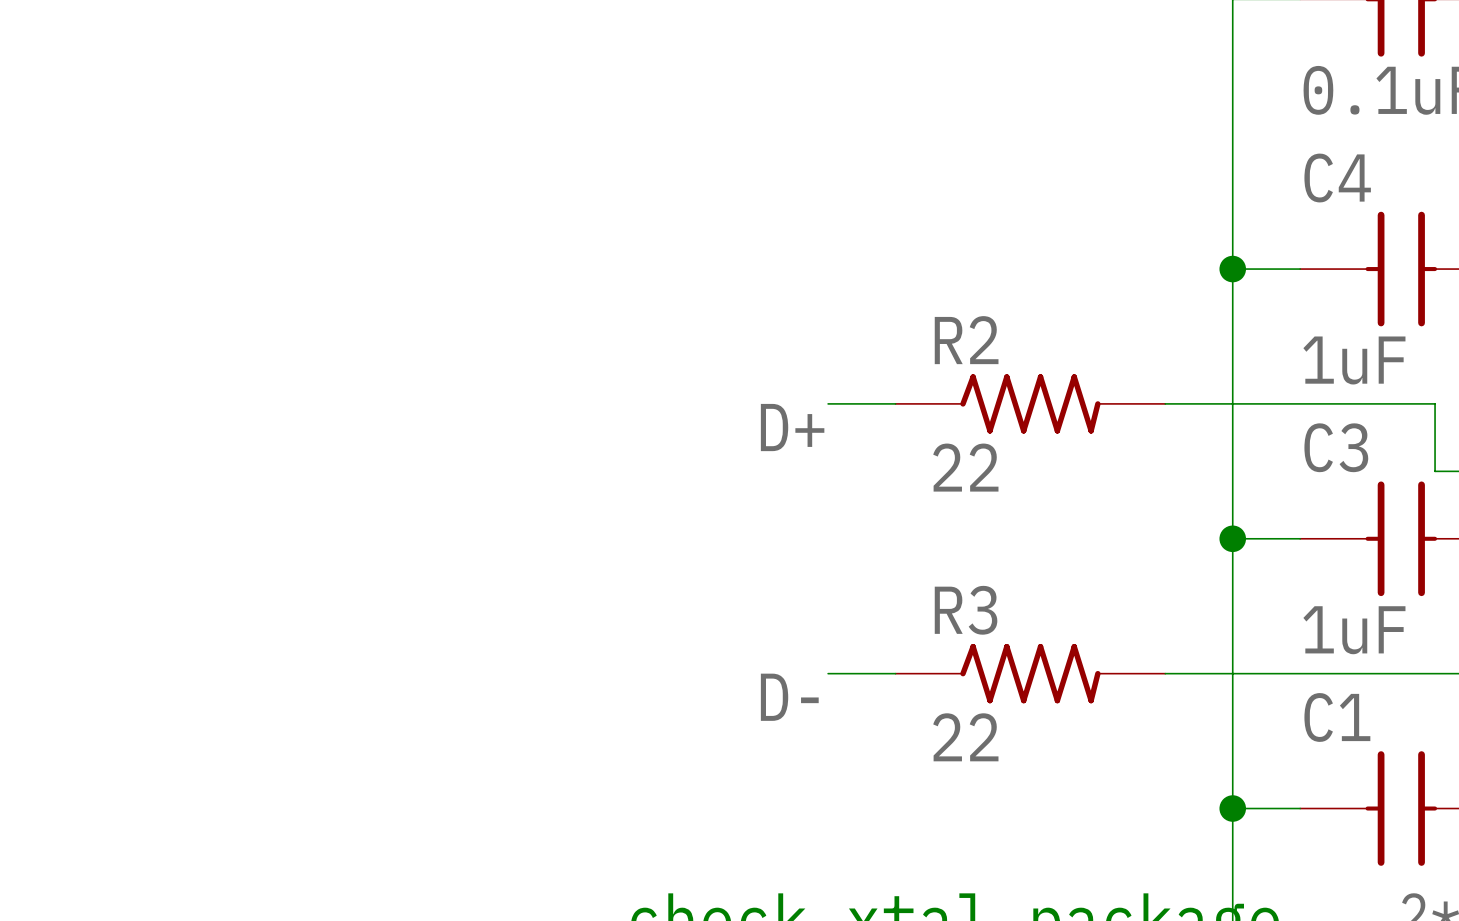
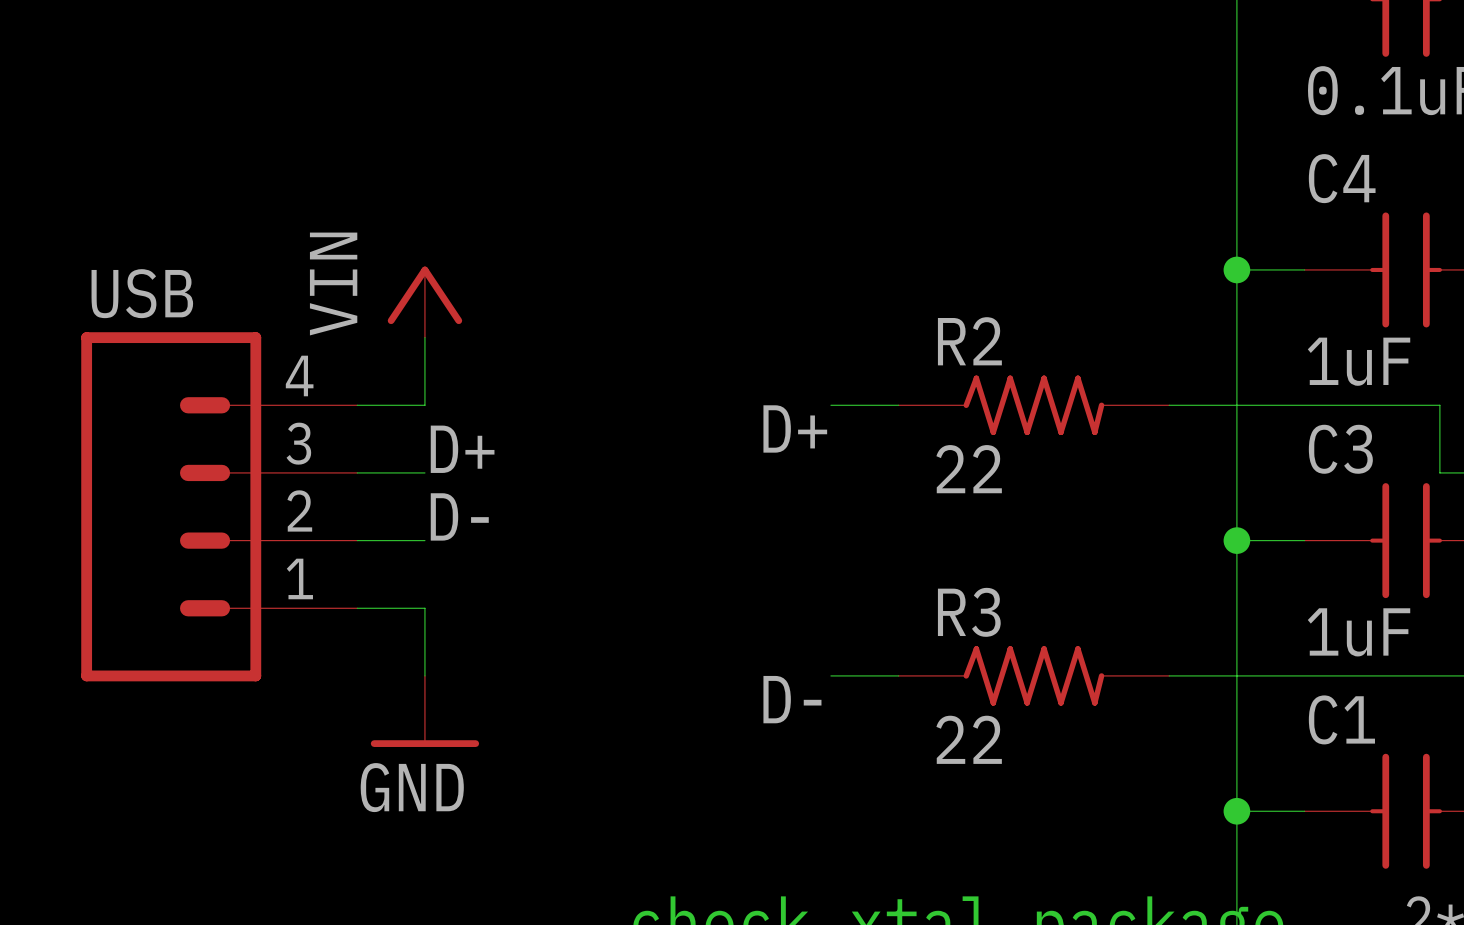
power symbol: none -> VIN (424, 302)
wire: none -> (424, 337) (424, 405) (357, 405)
label: none -> D+ (462, 449)
wire: none -> (357, 472) (424, 472)
USB: none -> (219, 506)
label: none -> D- (459, 516)
wire: none -> (357, 540) (424, 540)
wire: none -> (357, 608) (424, 608) (424, 675)
power symbol: none -> GND (424, 711)

